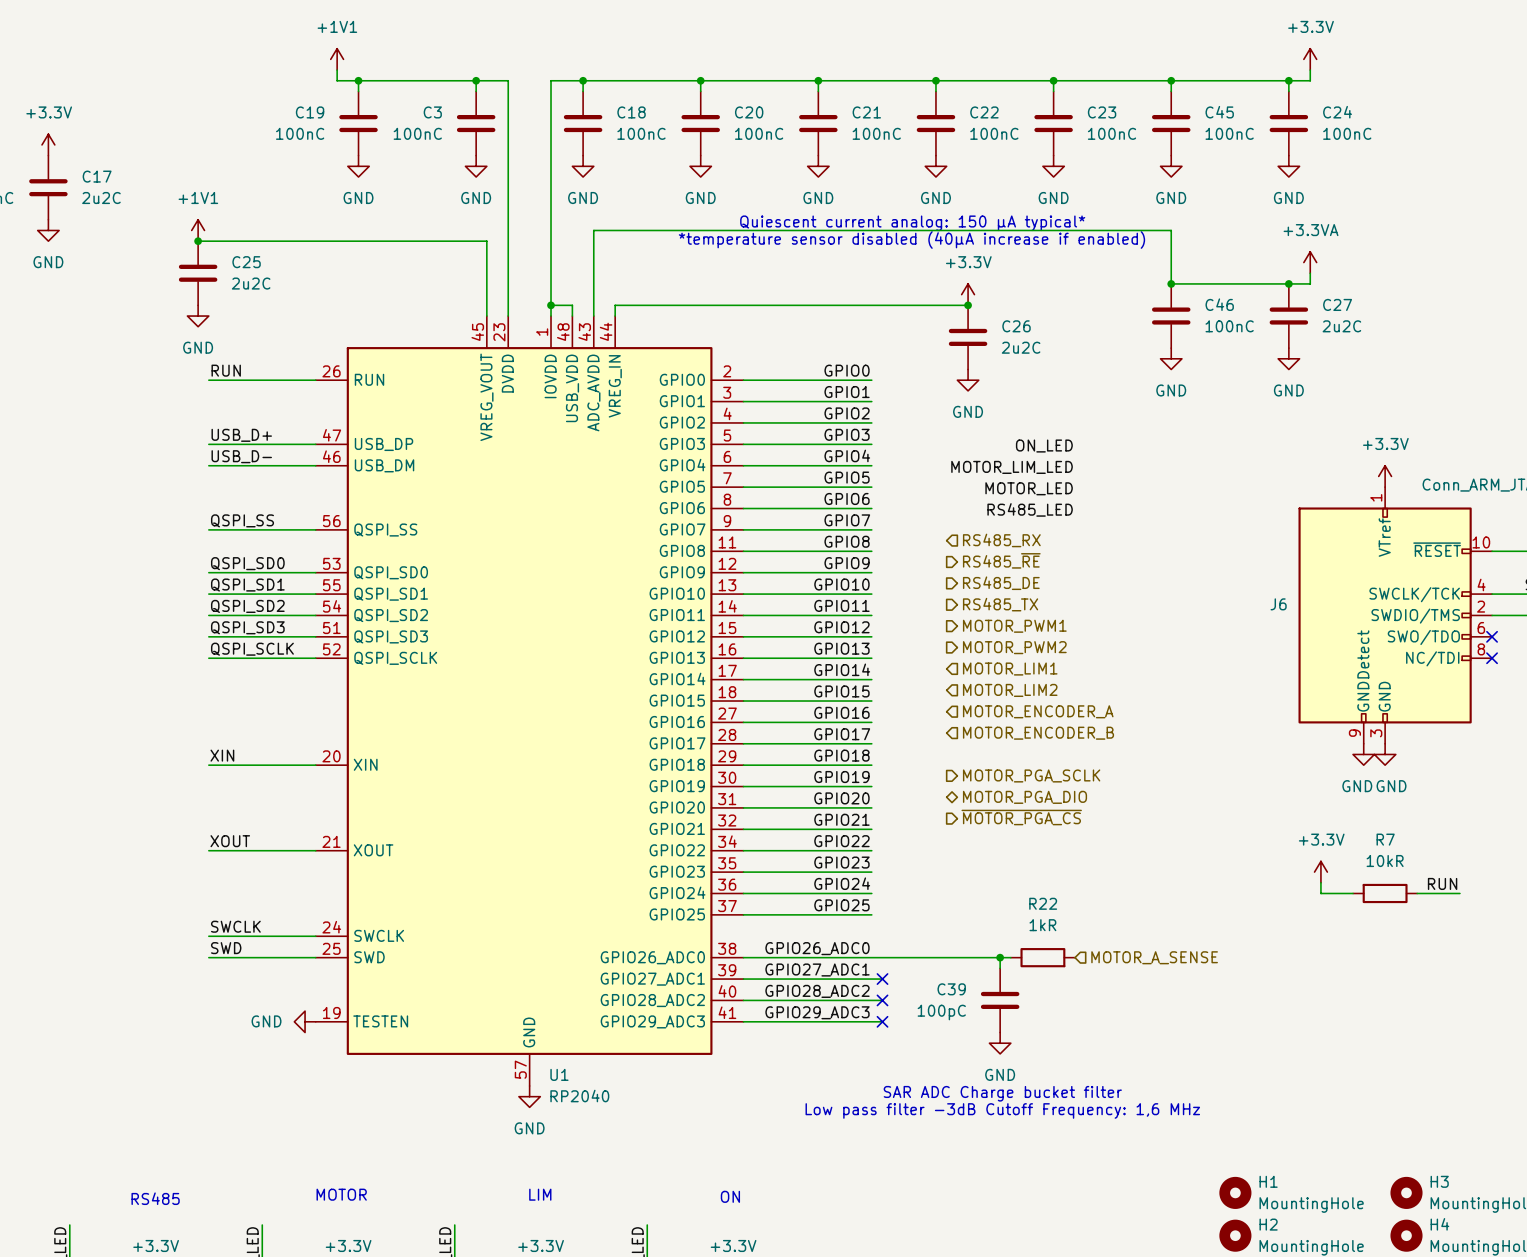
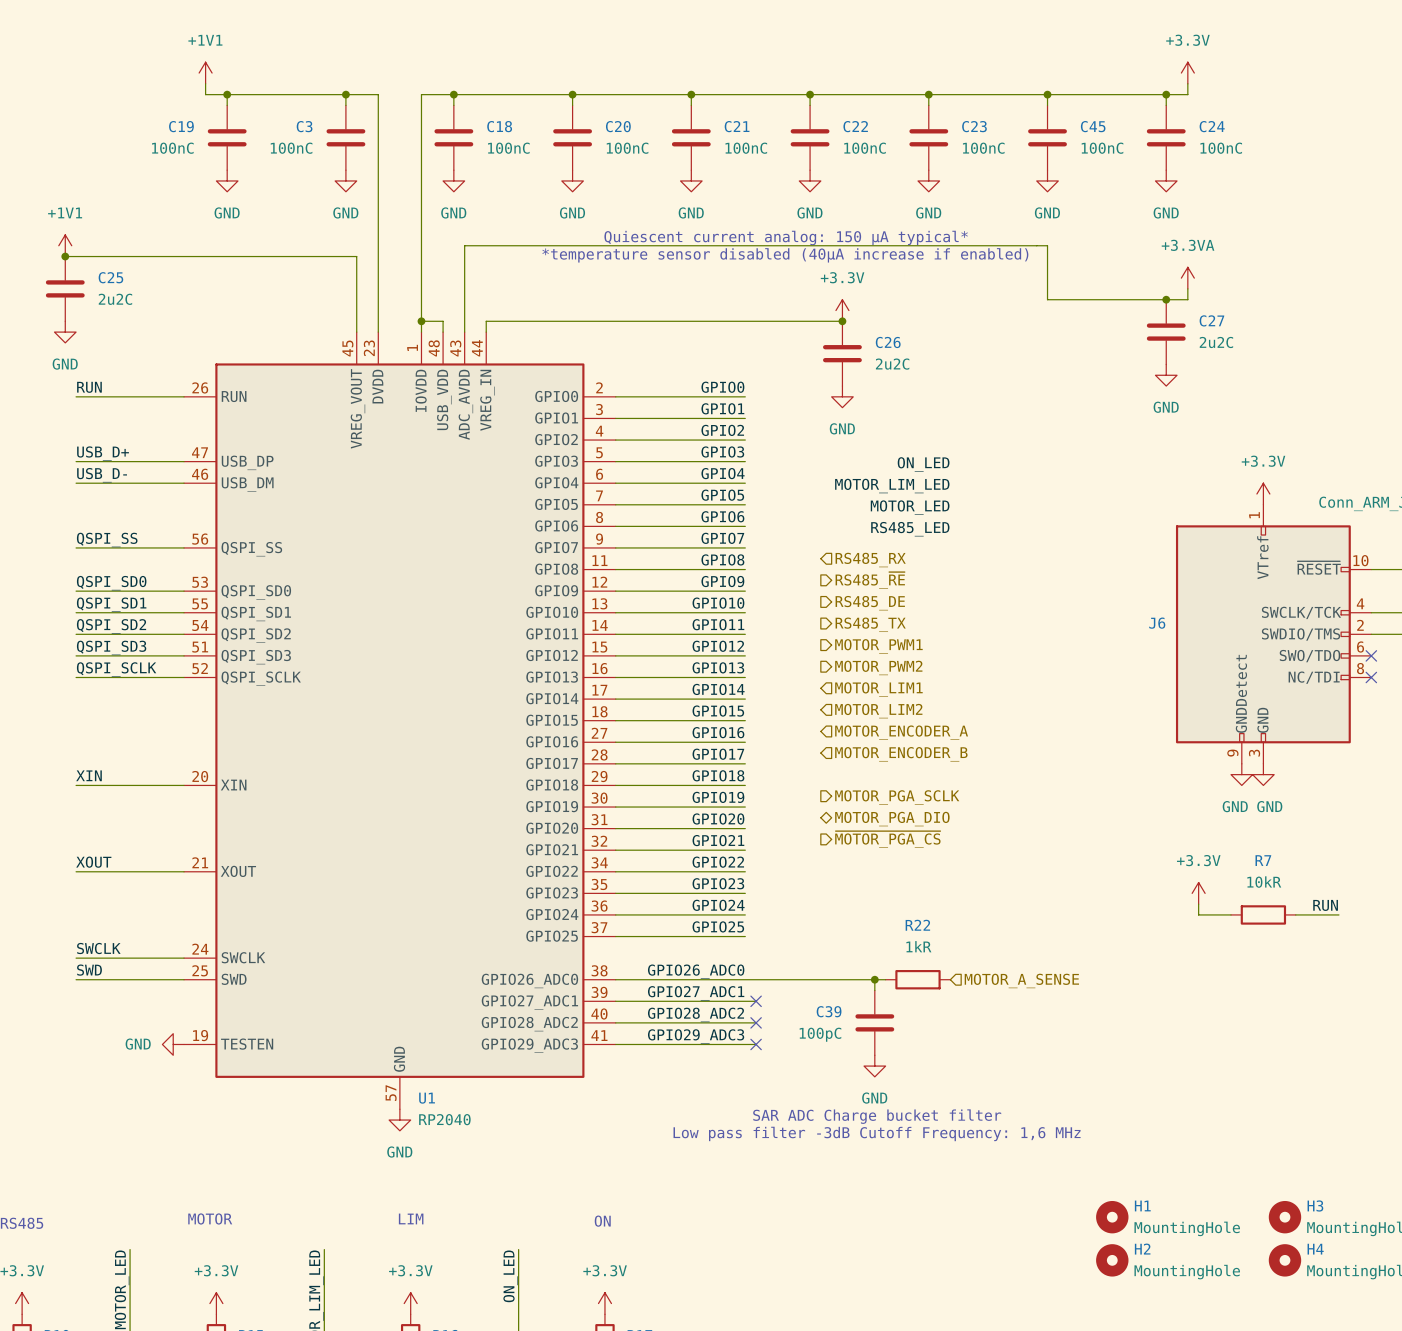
junction: (1171, 283) -> none
C46: 100nC (1171, 316) -> none
power symbol: GND (1171, 358) -> none

